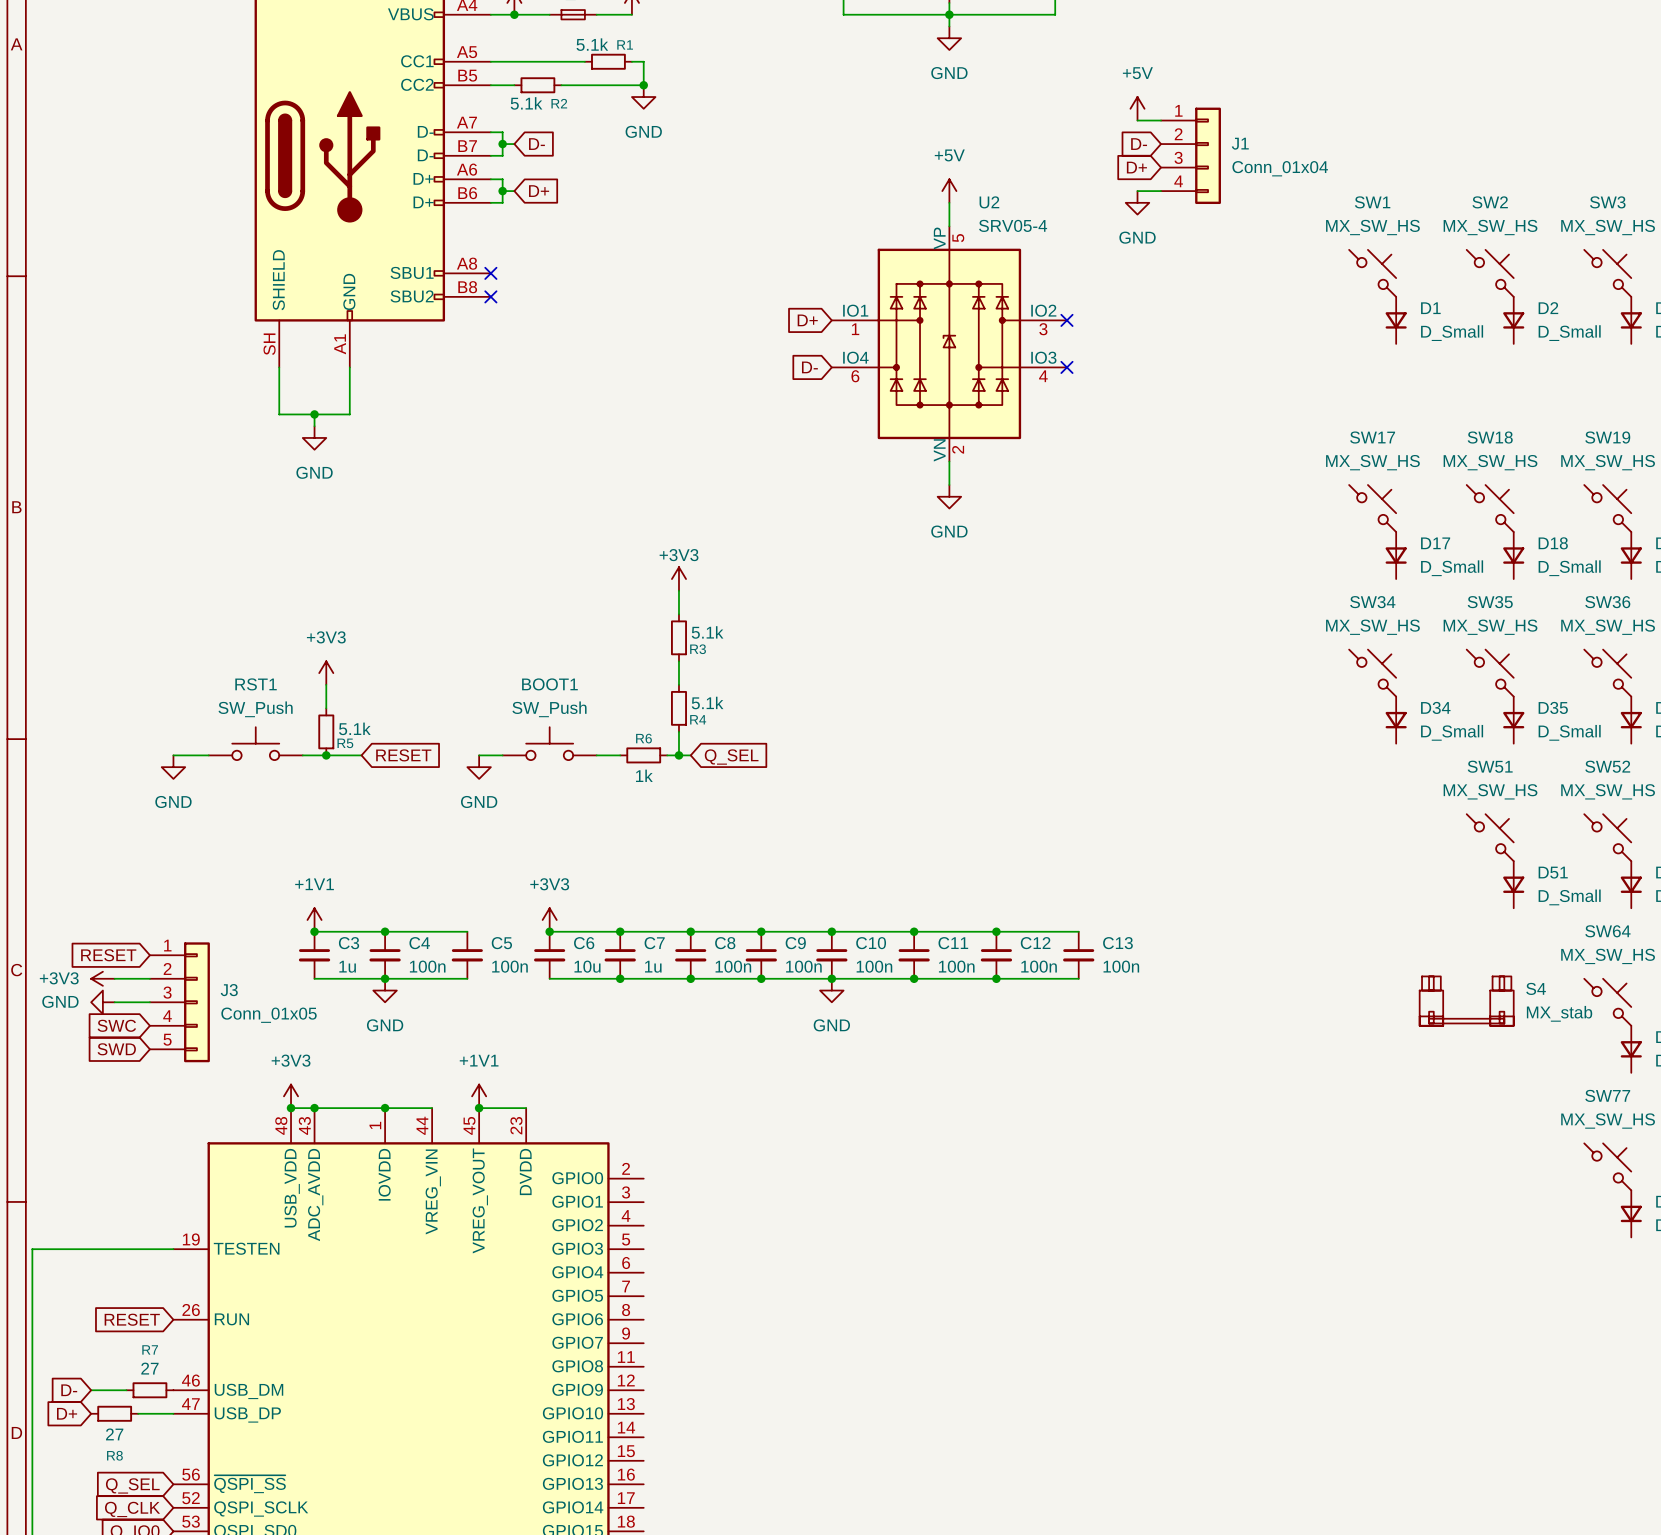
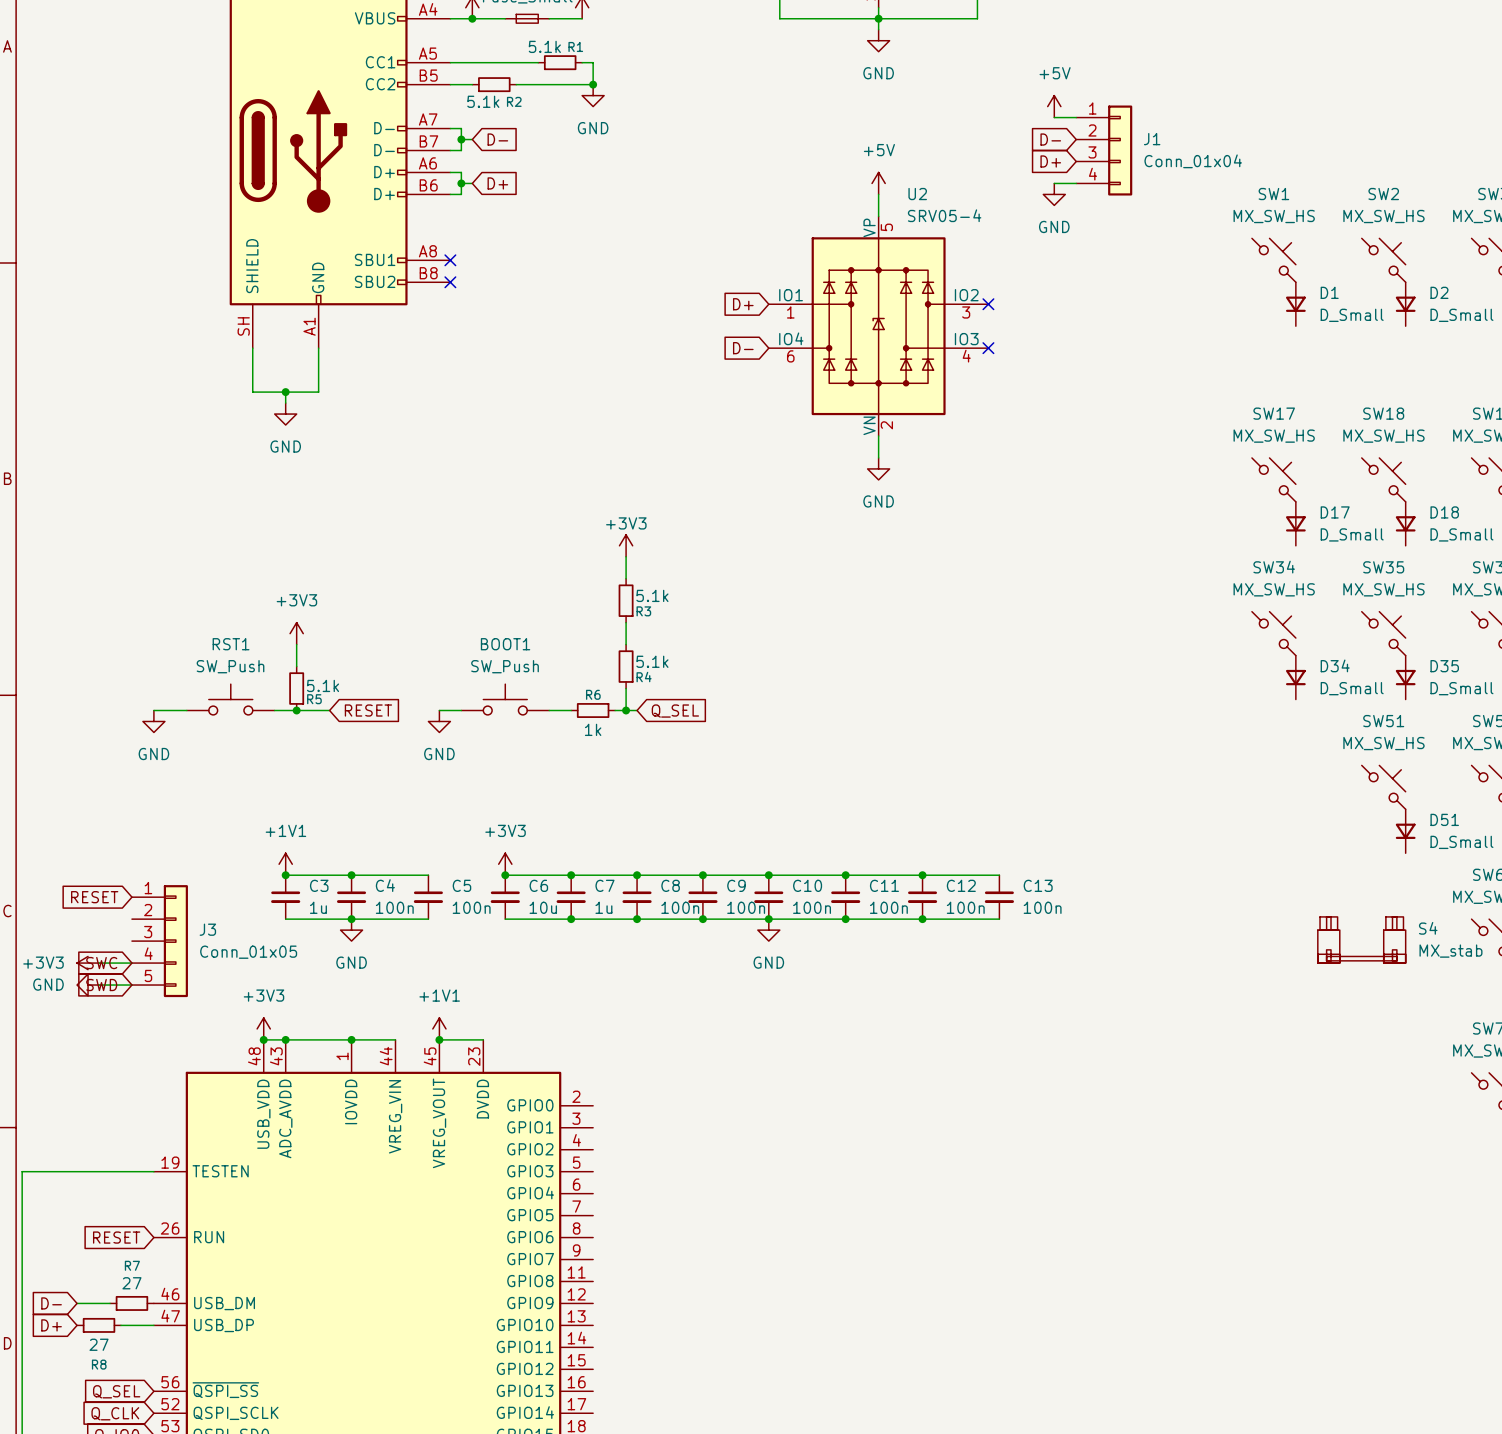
power symbol position: +3V3 (102, 978) -> +3V3 (88, 963)
wire: (114, 978) (149, 978) -> (99, 963) (131, 963)
power symbol position: GND (102, 1002) -> GND (88, 985)
wire: (114, 1002) (149, 1002) -> (99, 985) (131, 985)

